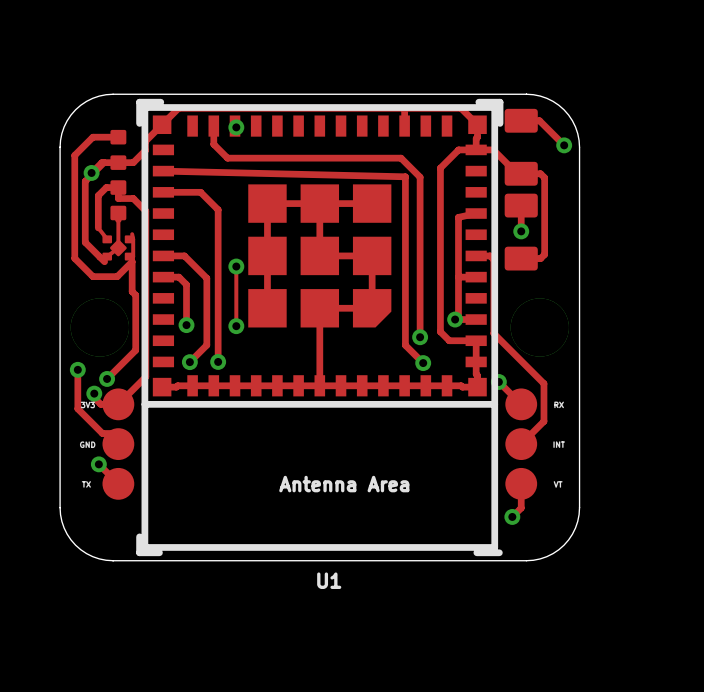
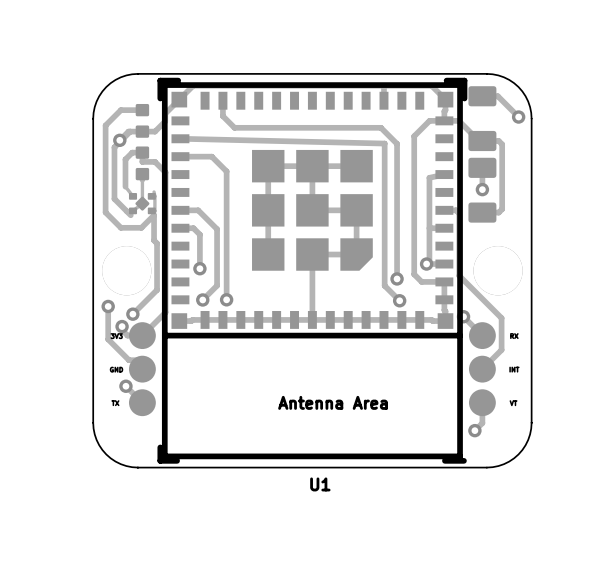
via: (236, 127) -> none
track: (236, 266) (236, 326) -> none
via: (236, 266) -> none
via: (236, 326) -> none

